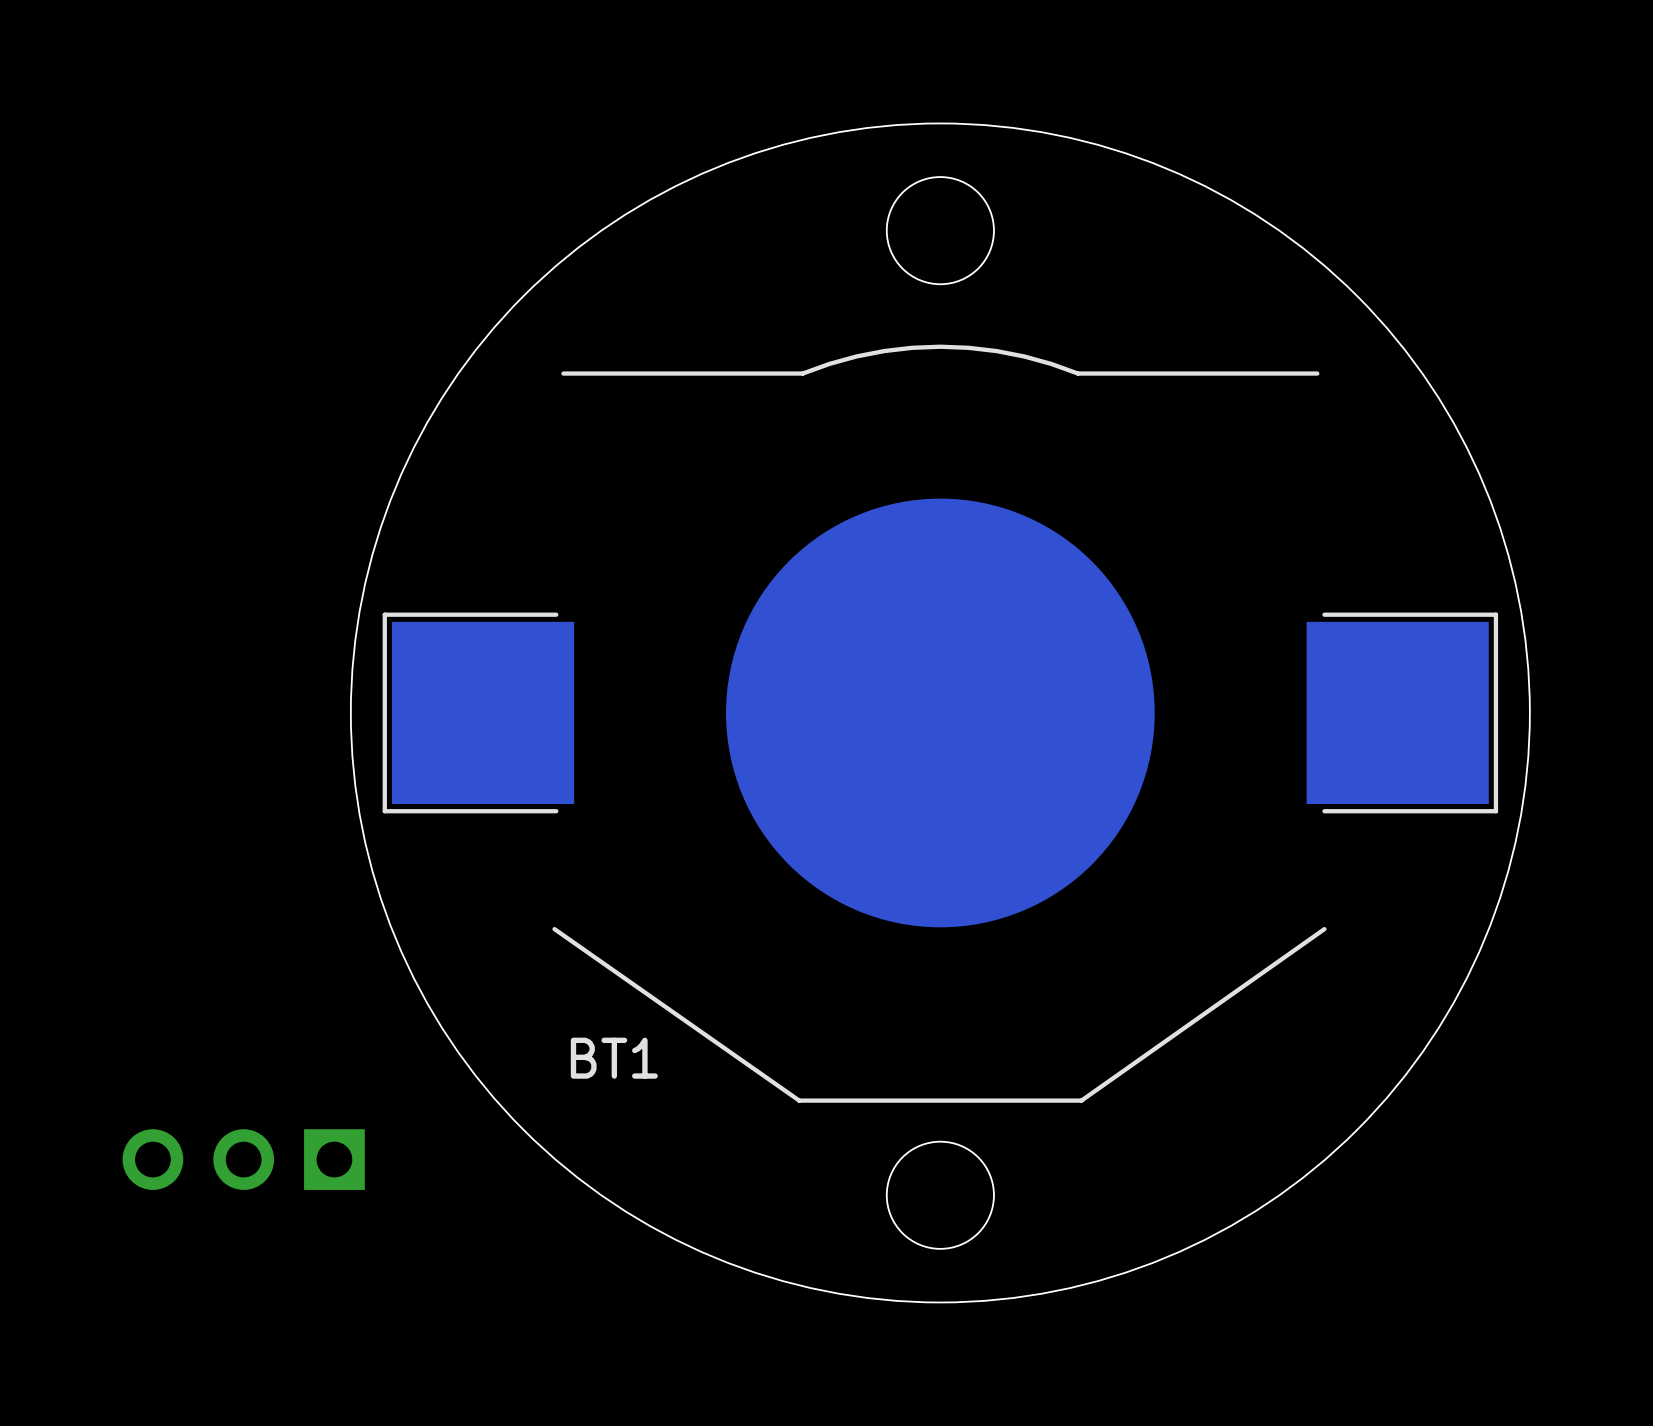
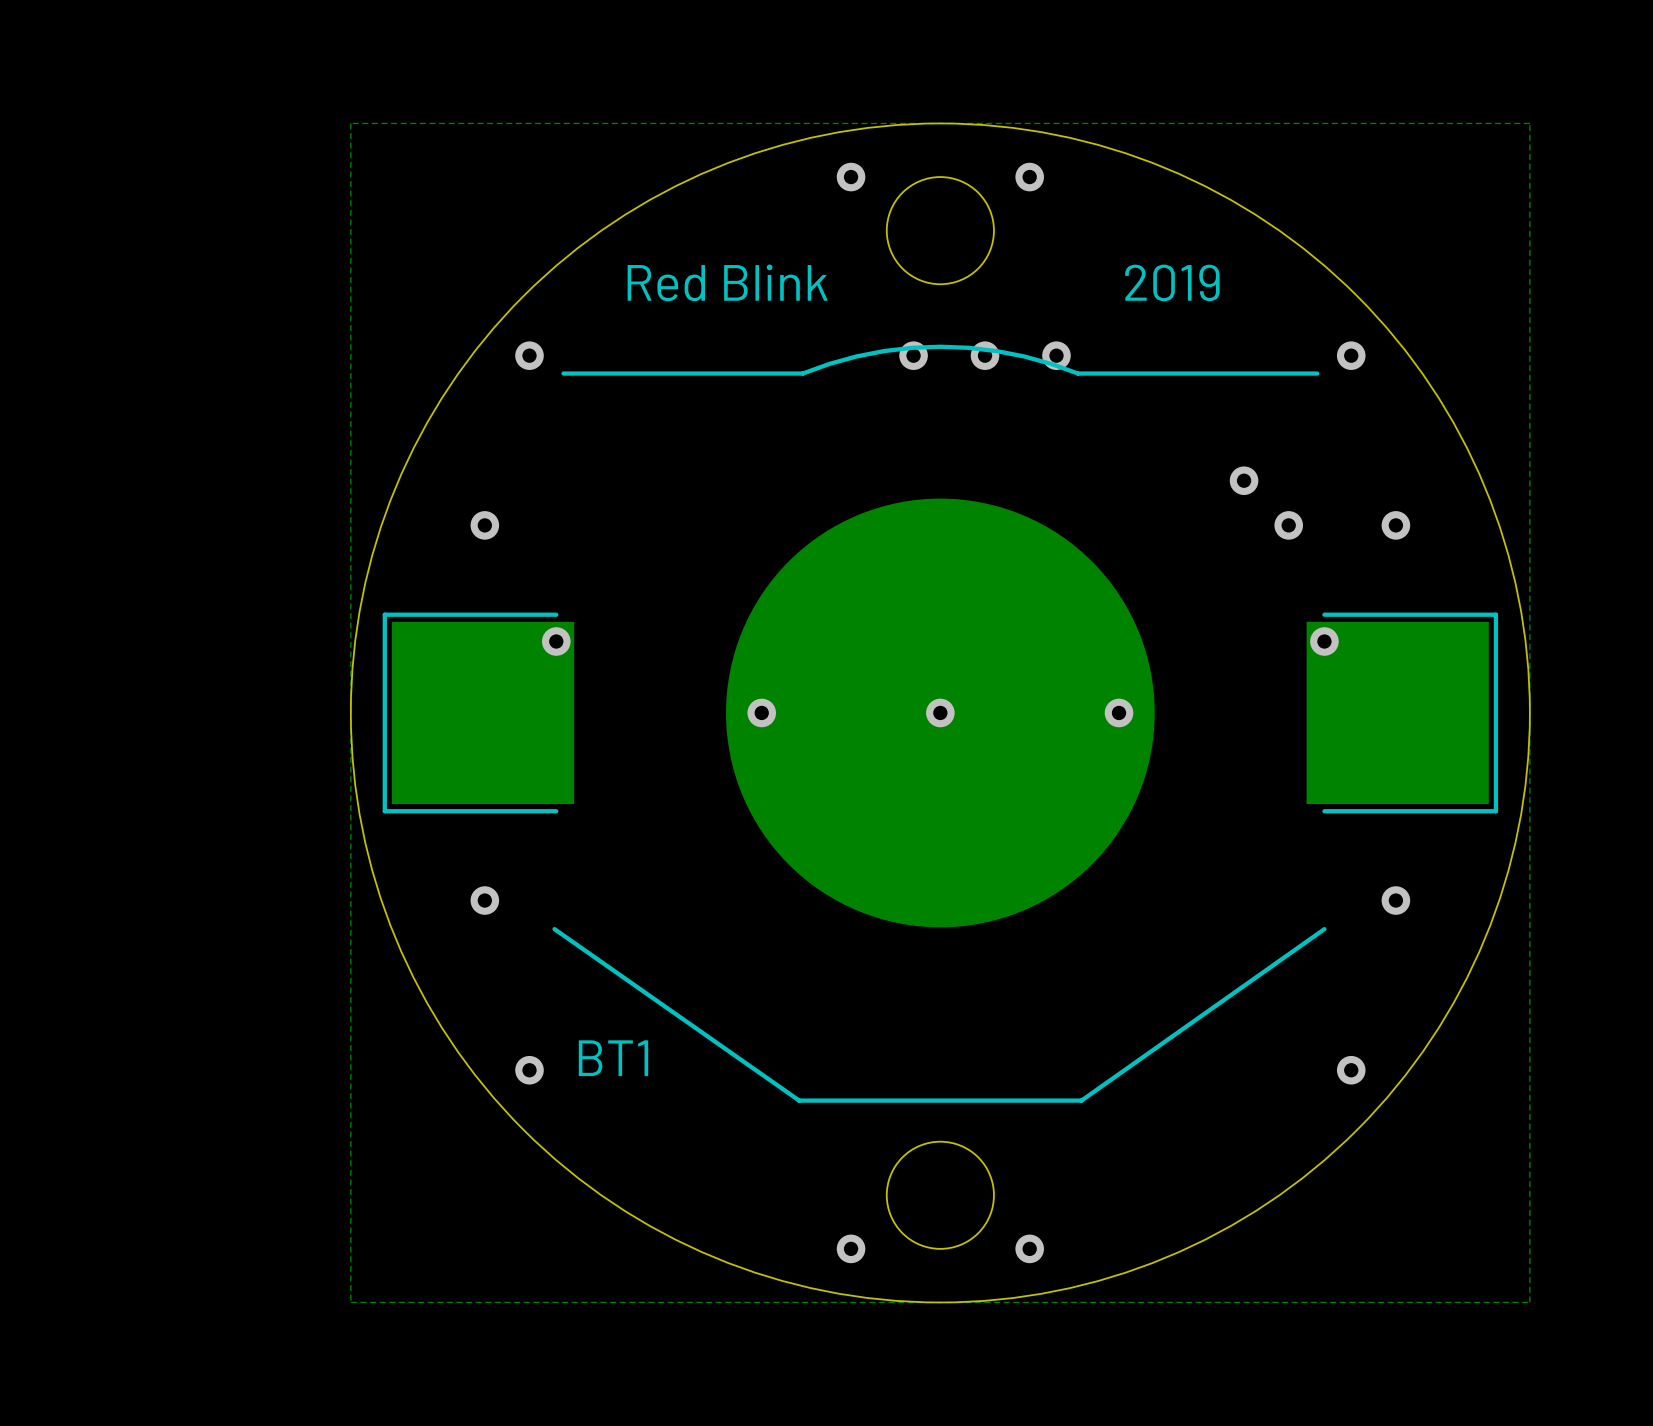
zone outline: none -> (1529, 123) (350, 123) (350, 1302) (1529, 1302) (1529, 123)
via: none -> (851, 177)
via: none -> (1029, 177)
text: none -> Red Blink (727, 282)
text: none -> 2019 (1172, 282)
via: none -> (529, 355)
via: none -> (913, 355)
via: none -> (985, 355)
via: none -> (1056, 355)
via: none -> (1351, 355)
via: none -> (1244, 480)
via: none -> (484, 525)
via: none -> (1288, 525)
via: none -> (1395, 525)
via: none -> (556, 641)
via: none -> (1324, 641)
via: none -> (761, 712)
via: none -> (940, 712)
via: none -> (1119, 712)
via: none -> (484, 900)
via: none -> (1395, 900)
via: none -> (529, 1070)
via: none -> (1351, 1070)
part: (243, 1159) -> none
via: none -> (851, 1248)
via: none -> (1029, 1248)

